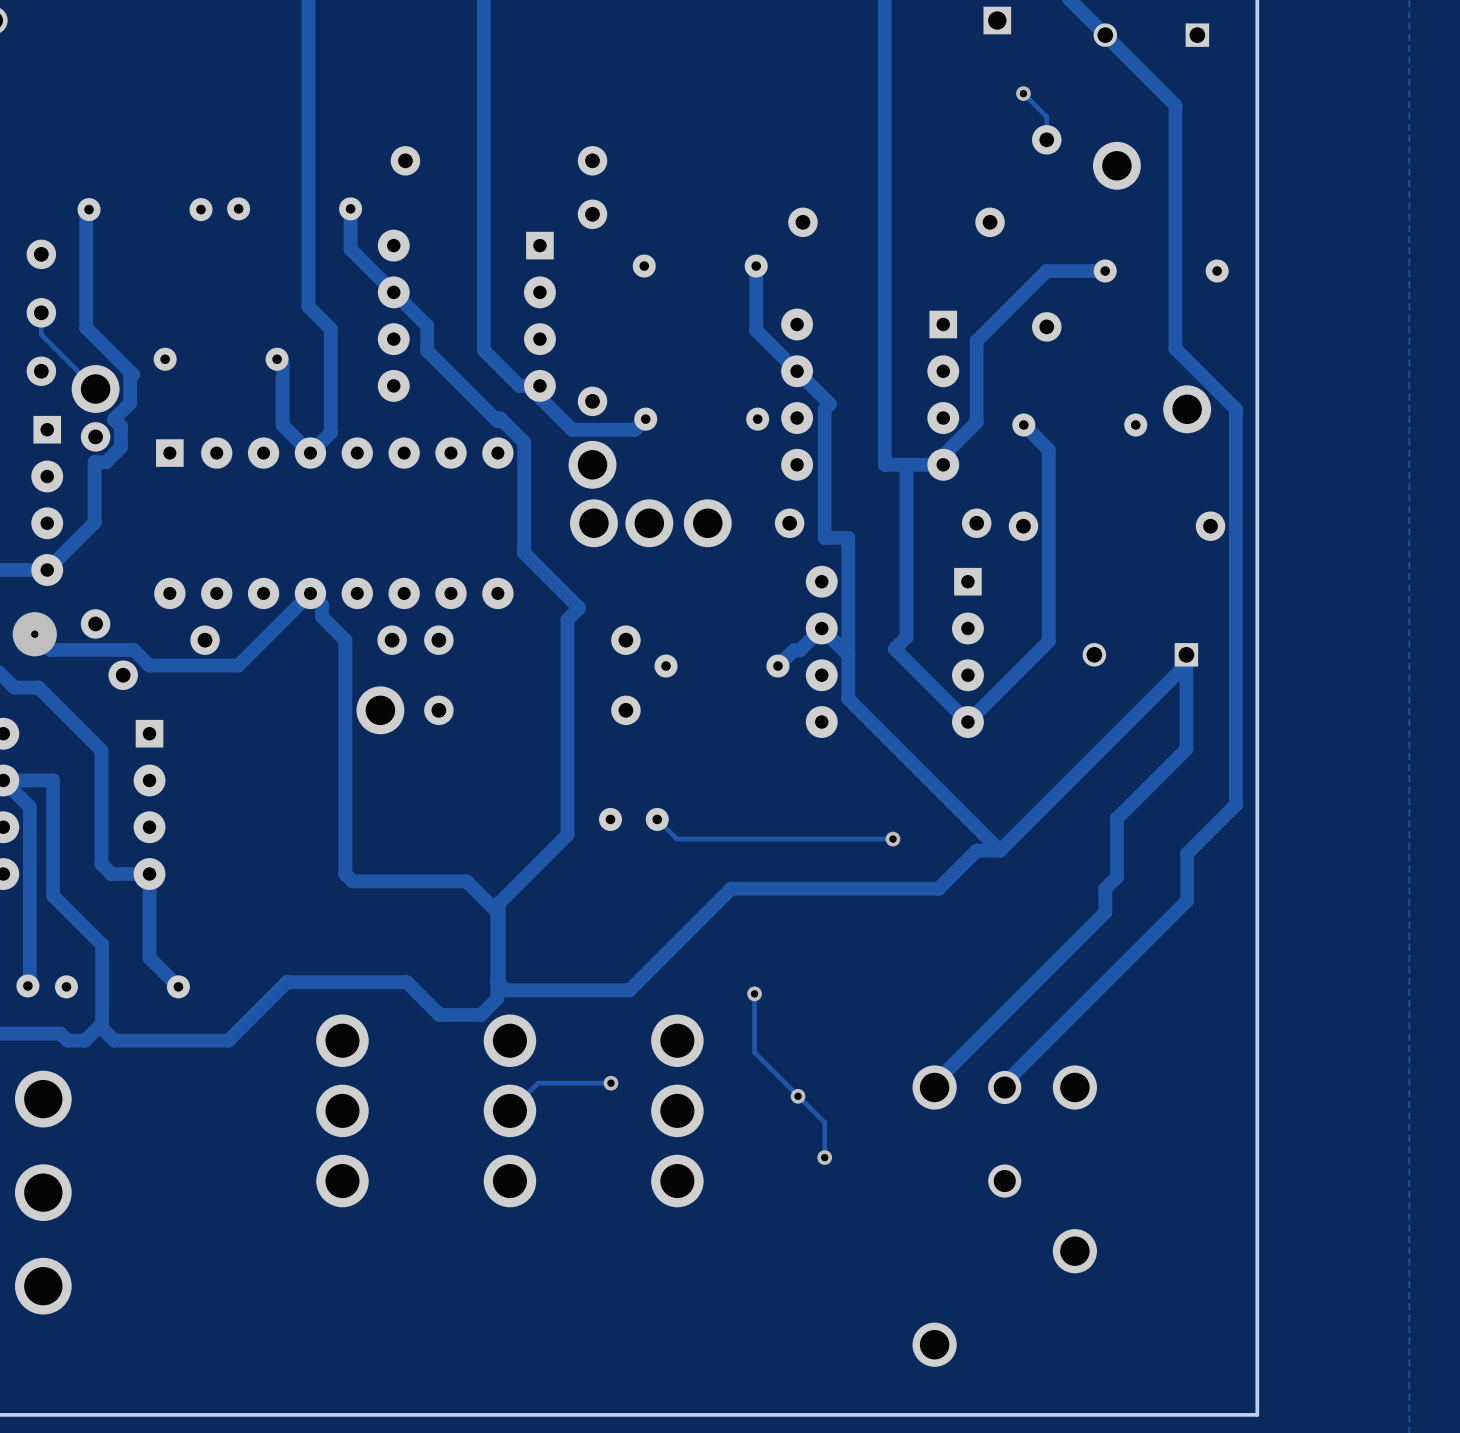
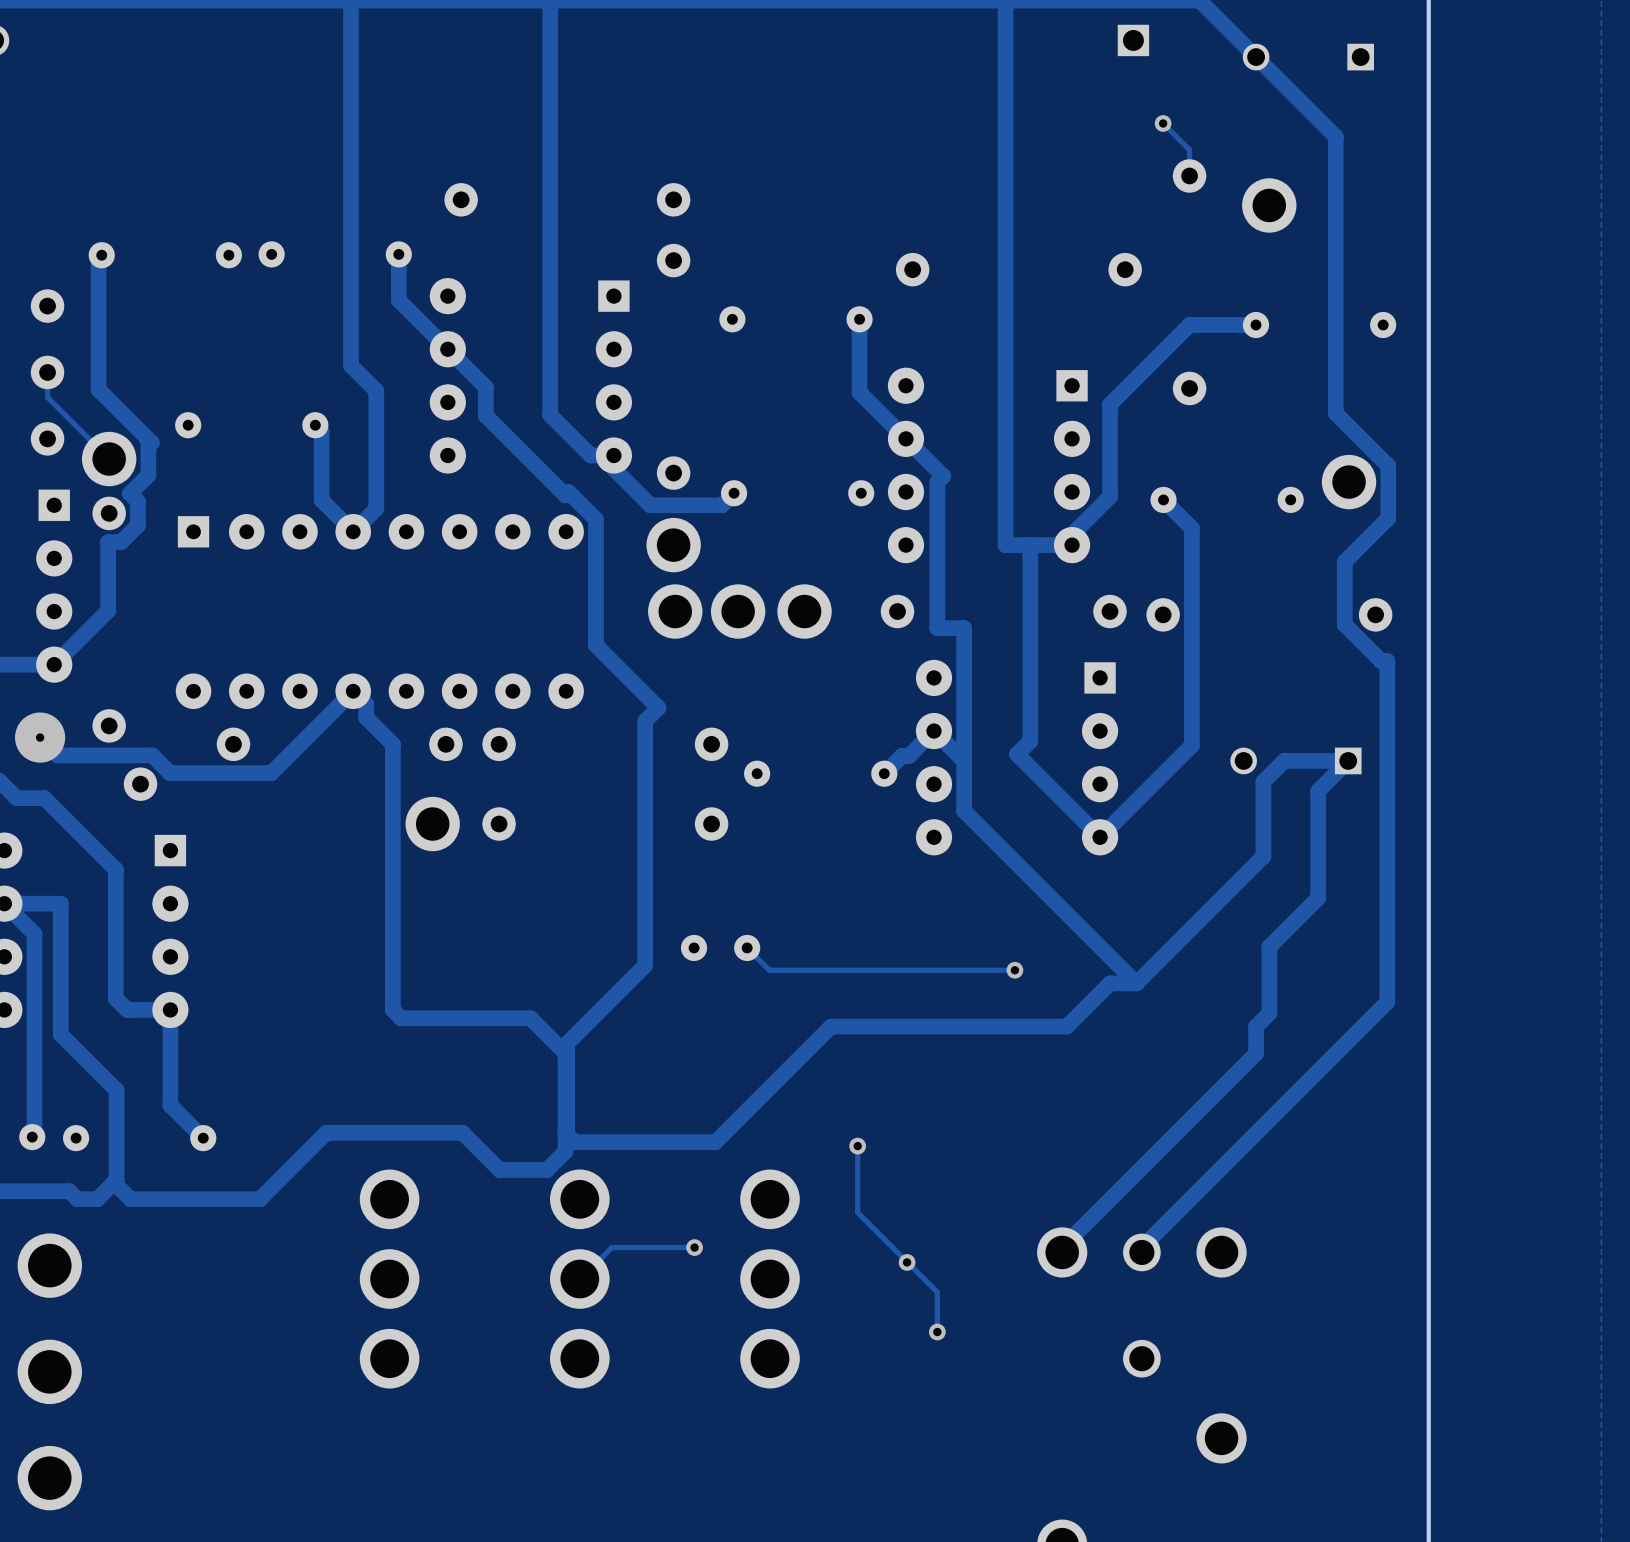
track: (1221, 394) (1235, 409) (1235, 804) (1187, 853) (1187, 900) -> (1388, 465) (1388, 518) (1344, 561) (1344, 624) (1381, 661) (1387, 661) (1387, 1002) (1349, 1040)
track: (1186, 654) (1186, 749) (1160, 775) -> (1263, 856) (1263, 781) (1284, 760) (1348, 760) (1318, 790) (1318, 898)
track: (1186, 664) (1111, 738) -> none

